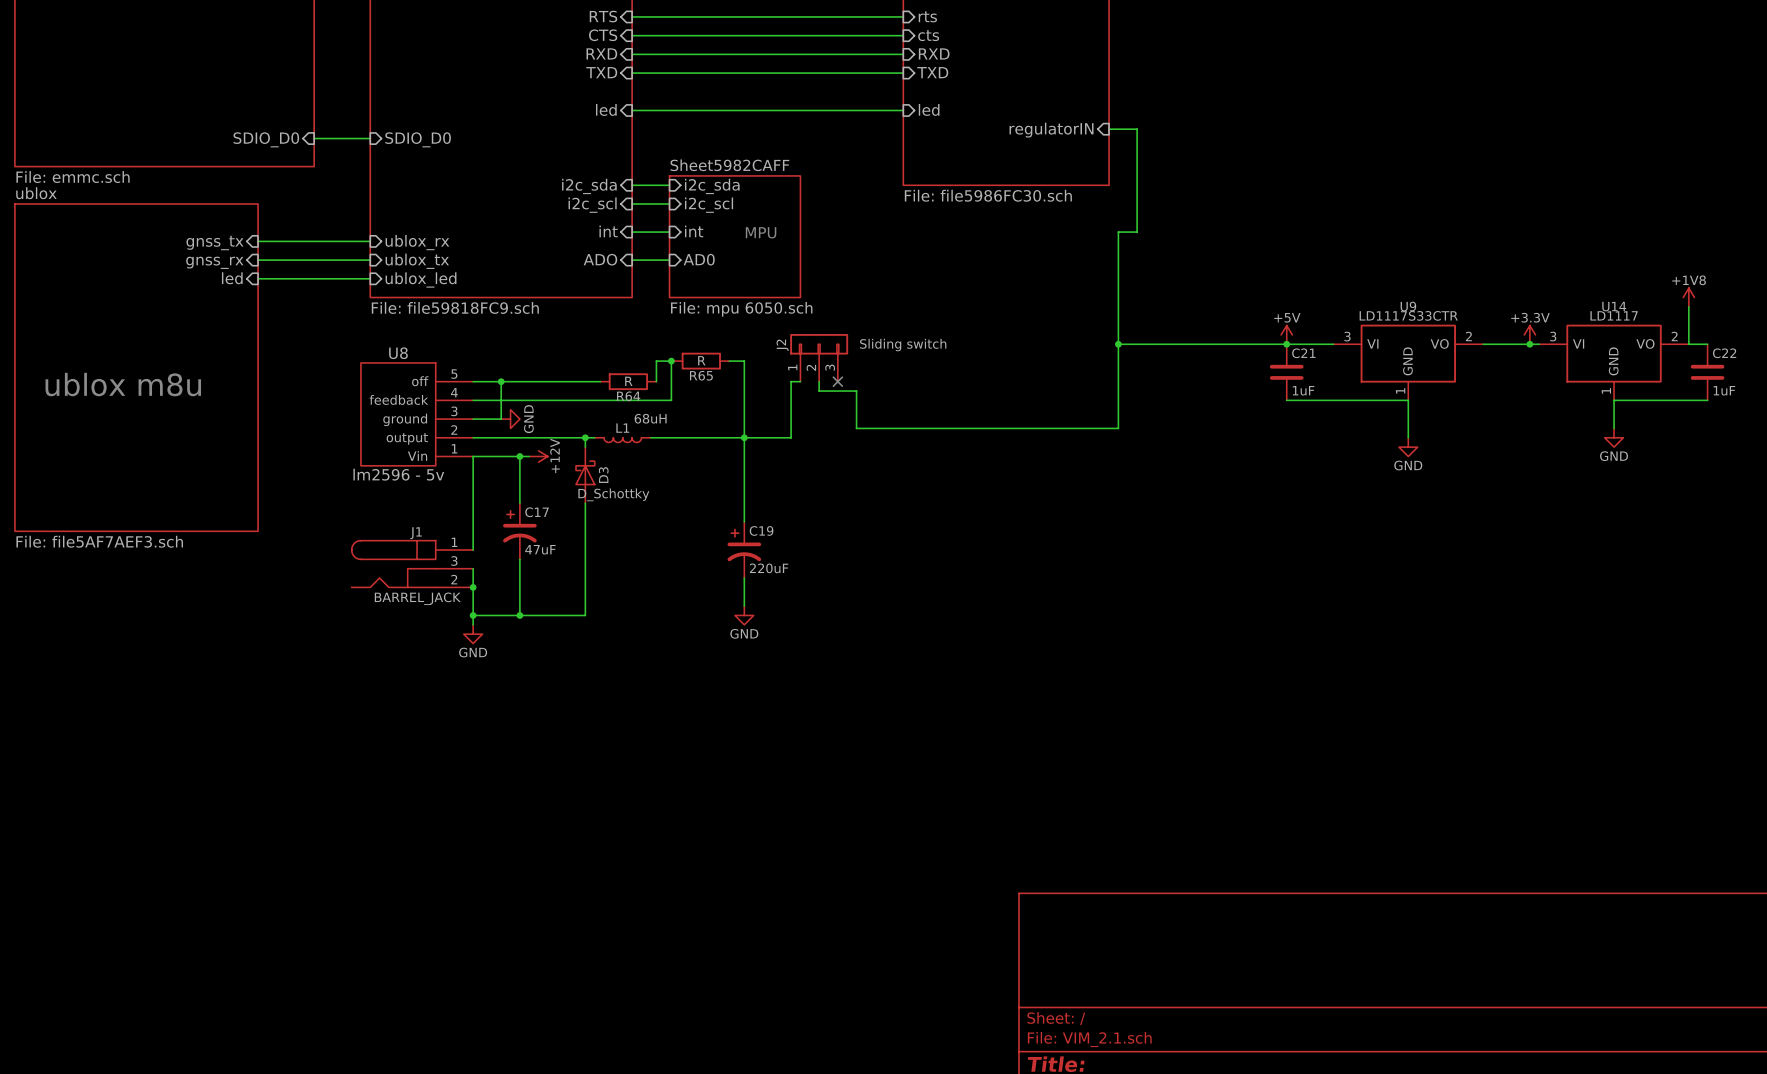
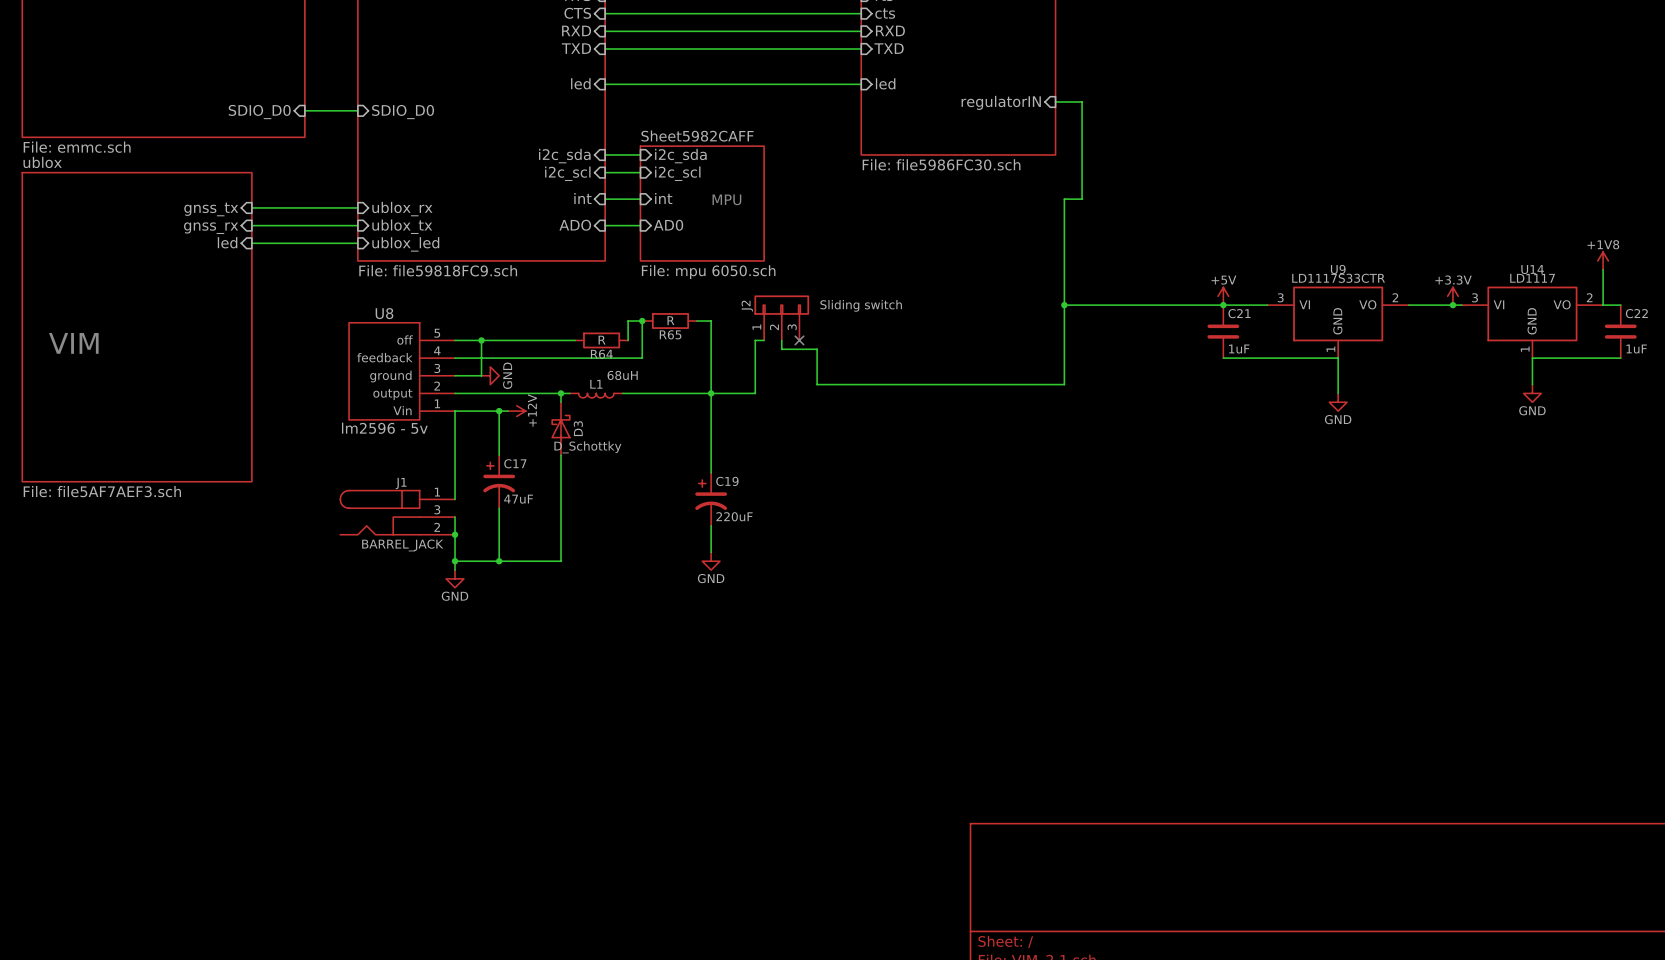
text: ublox m8u (123, 384) -> VIM (73, 343)

